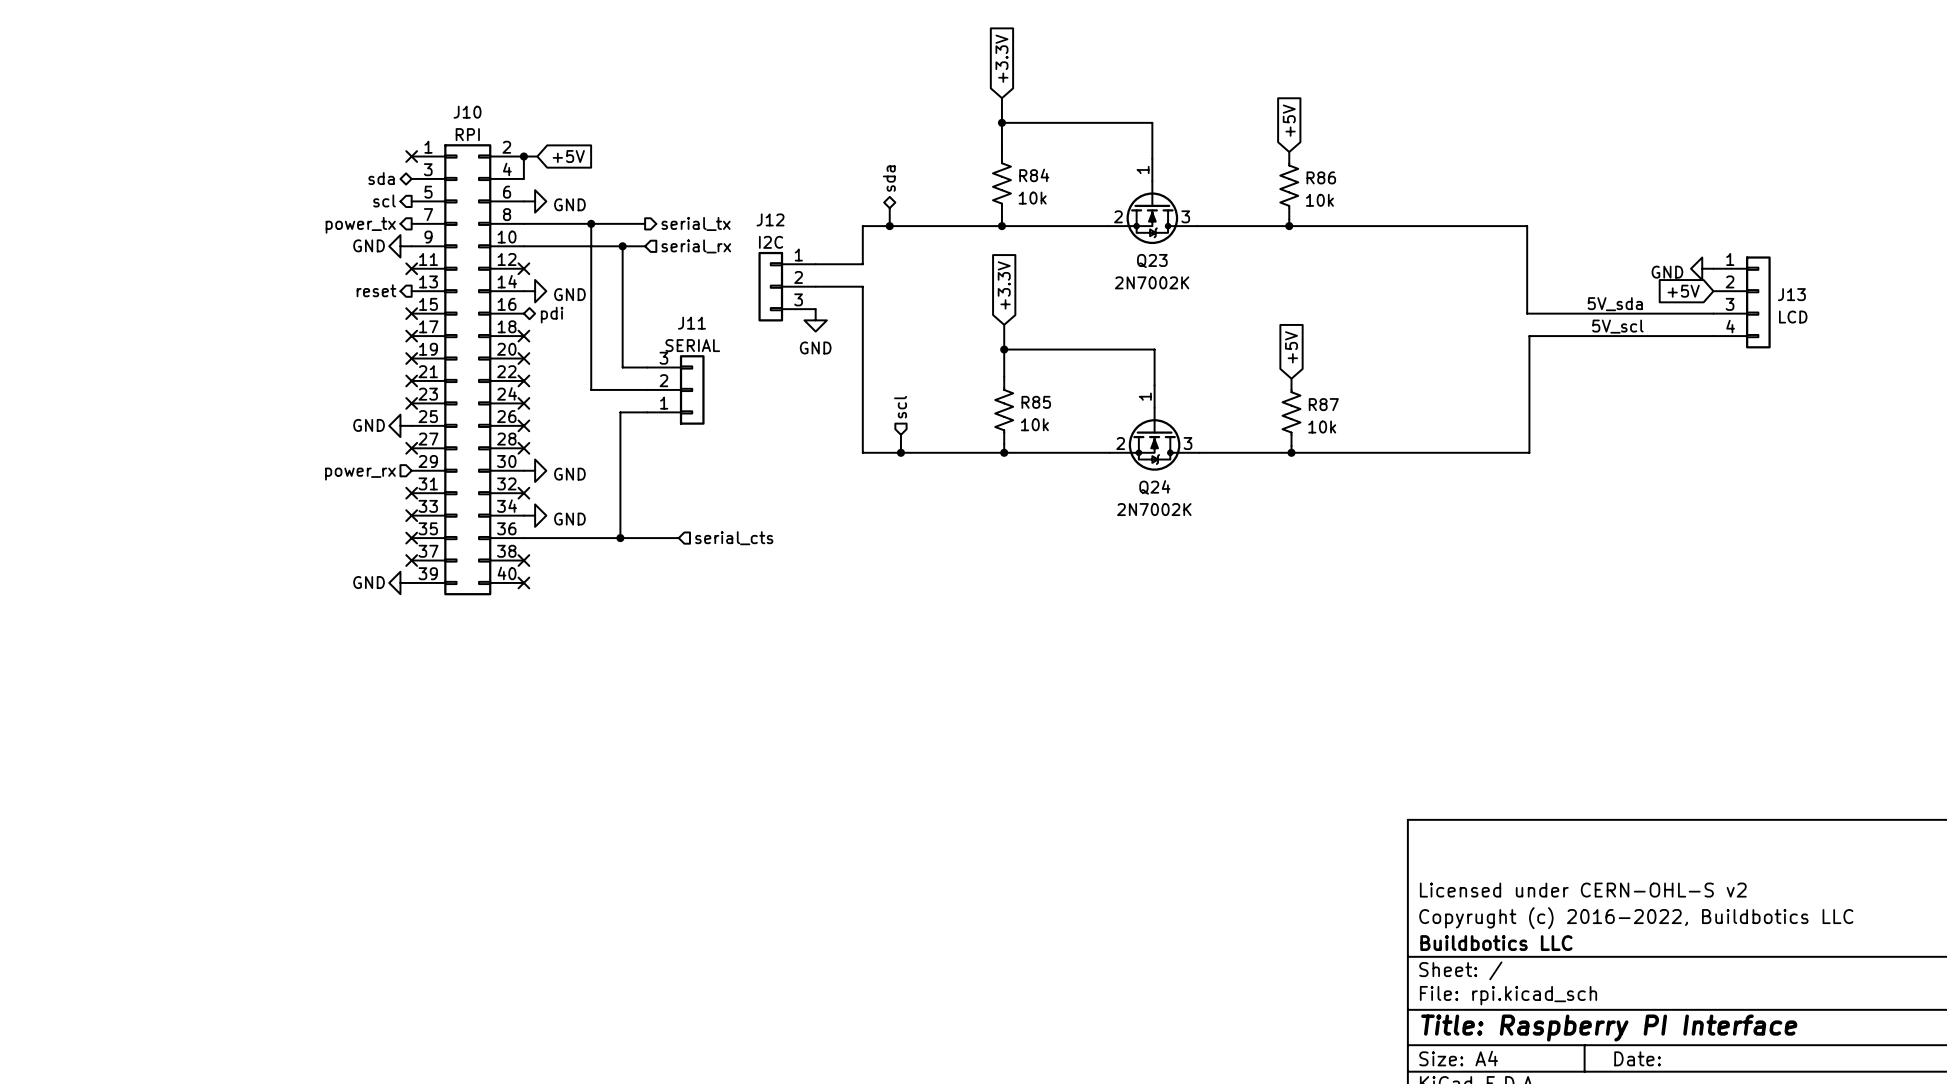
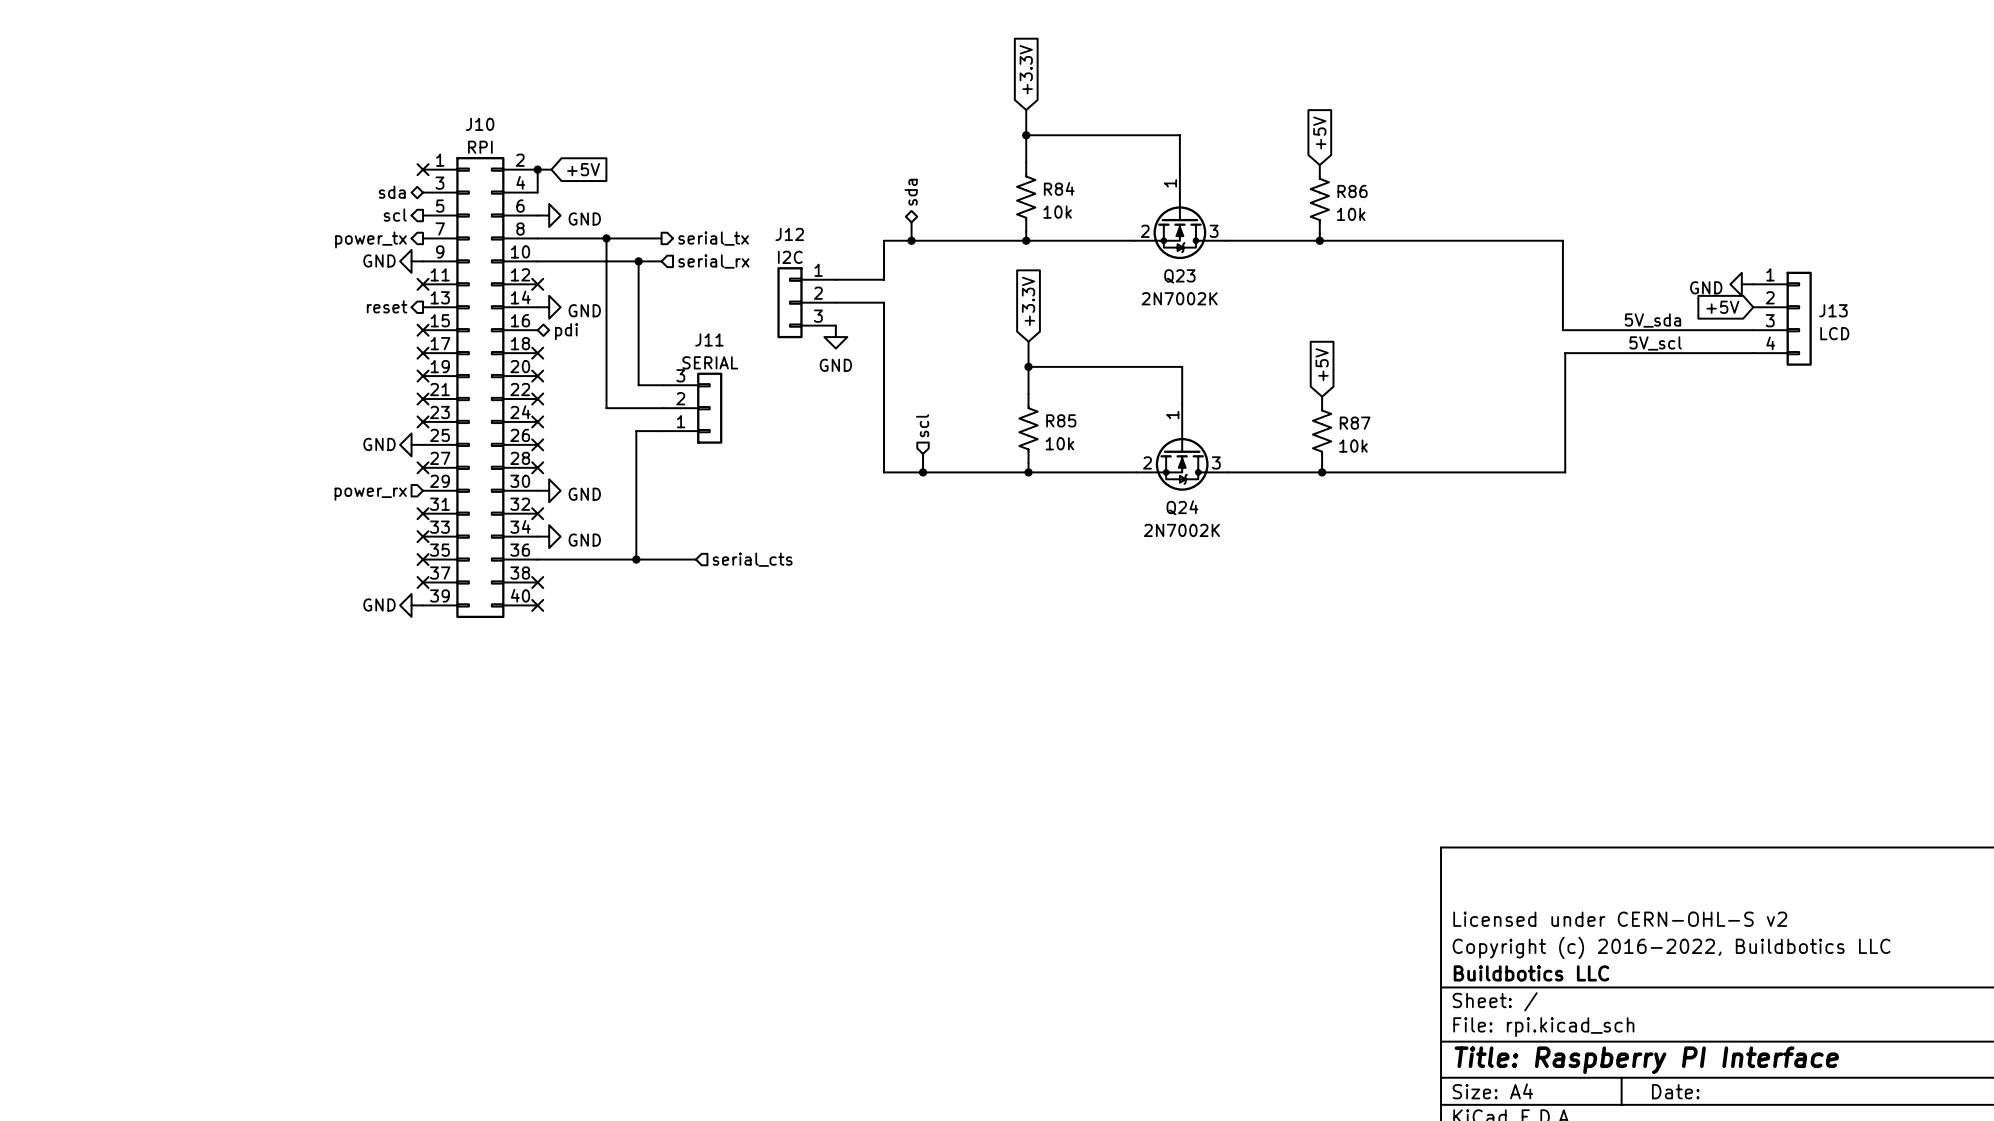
title block: Copyrught (c) 2016-2022, Buildbotics LLC (1636, 918) -> Copyright (c) 2016-2022, Buildbotics LLC (1671, 947)

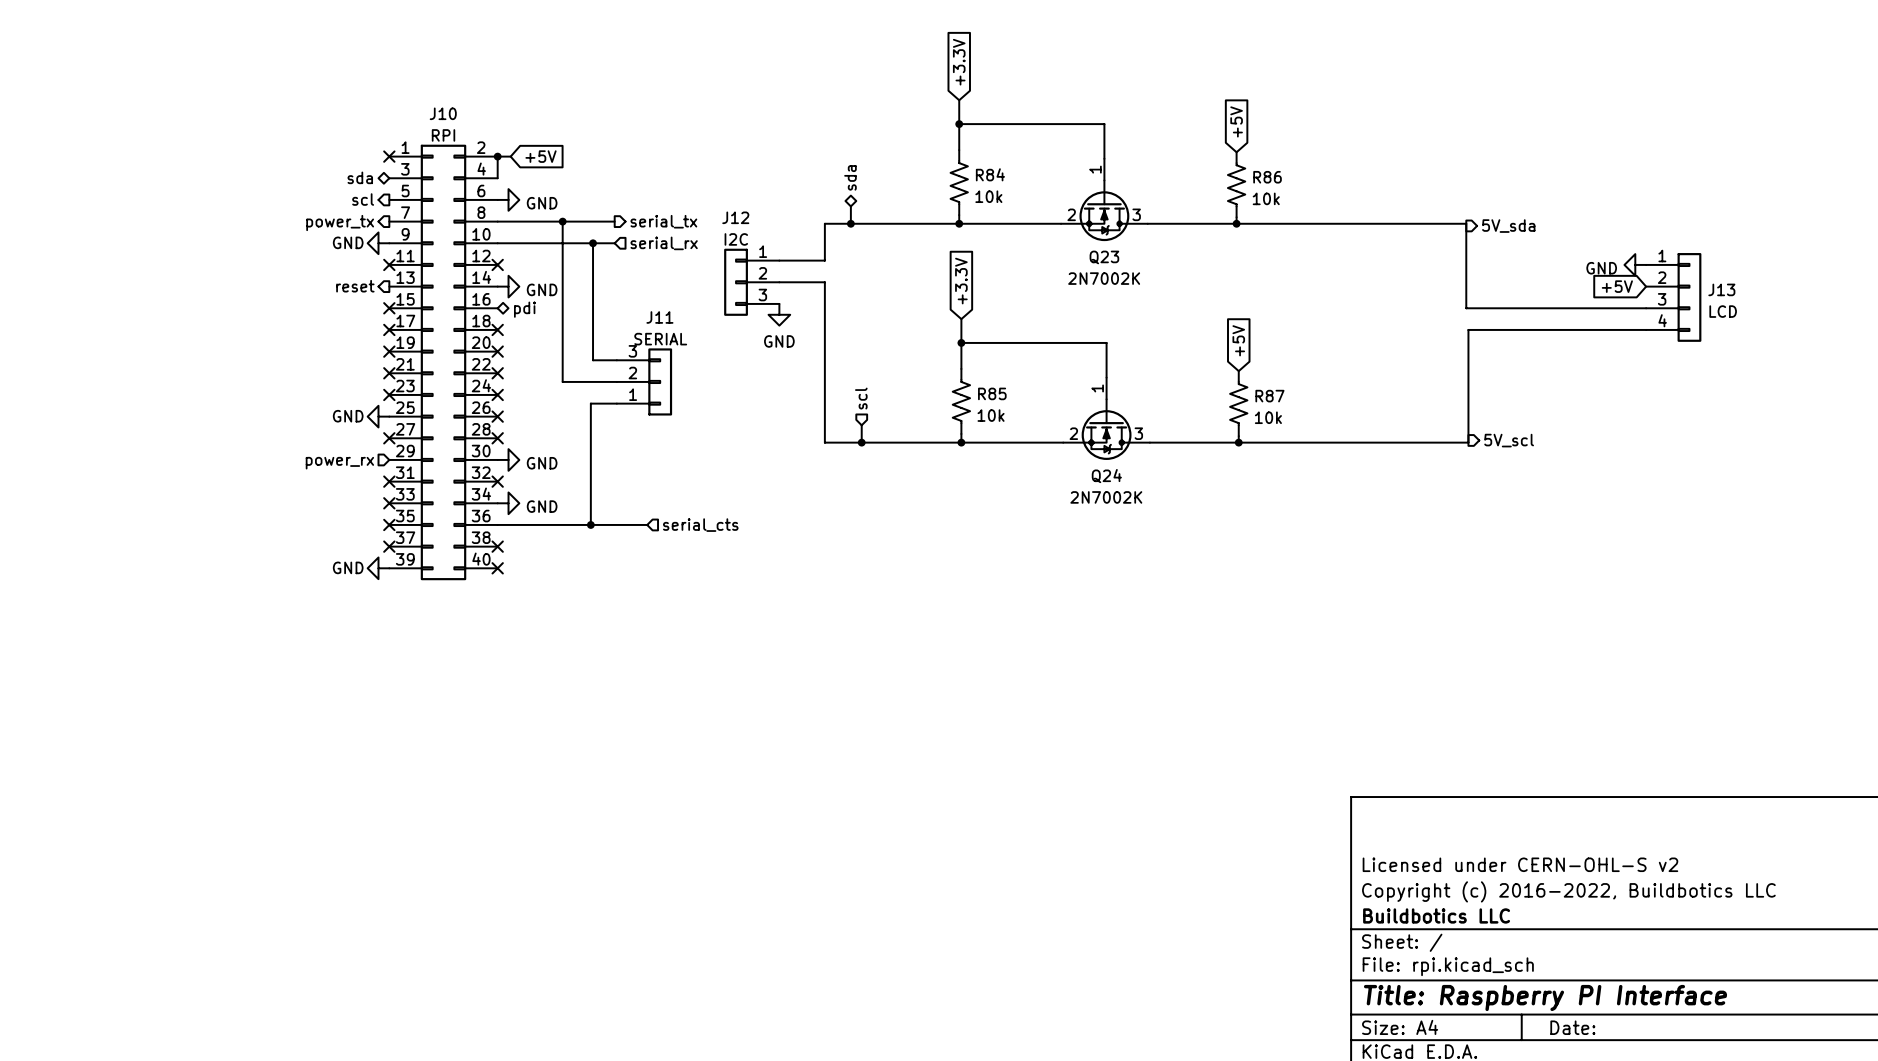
hierarchical label: none -> 5V_sda (1508, 226)
label: 5V_sda (1652, 320) -> none
label: 5V_scl (1655, 343) -> none
hierarchical label: none -> 5V_scl (1509, 440)

